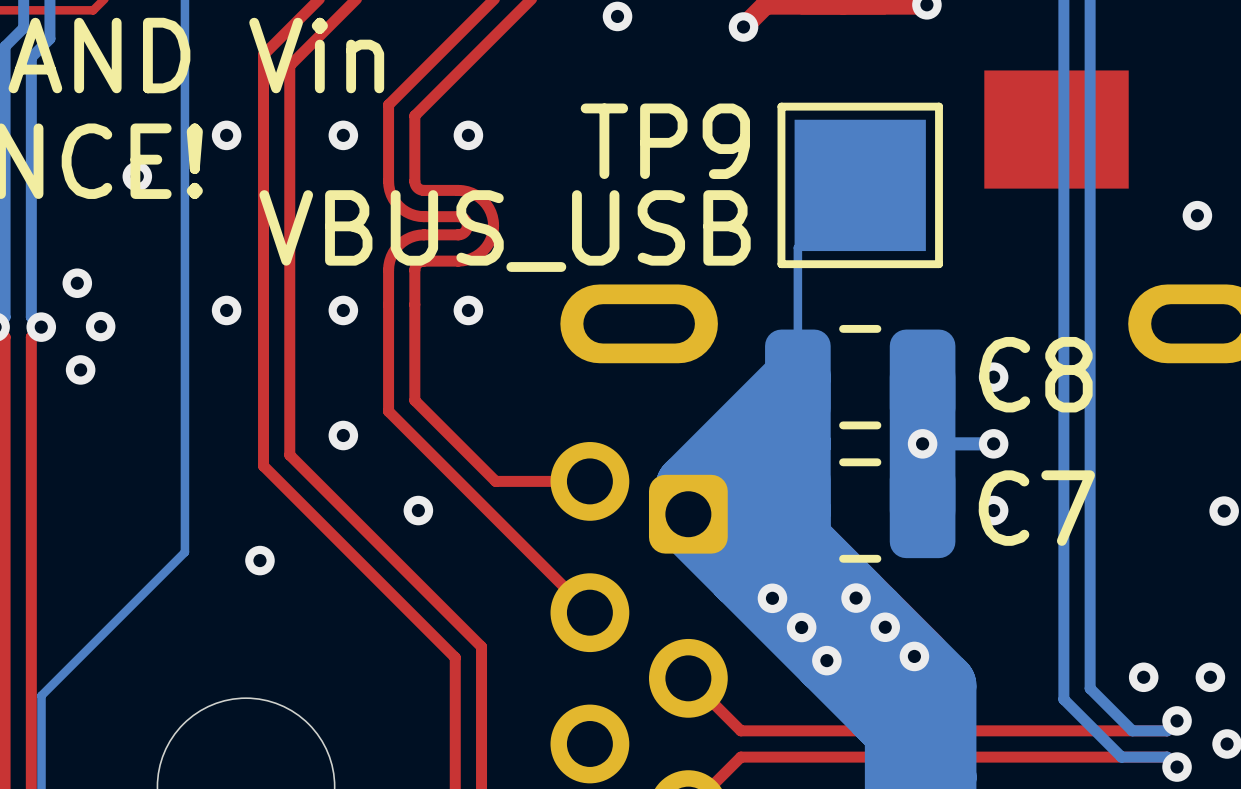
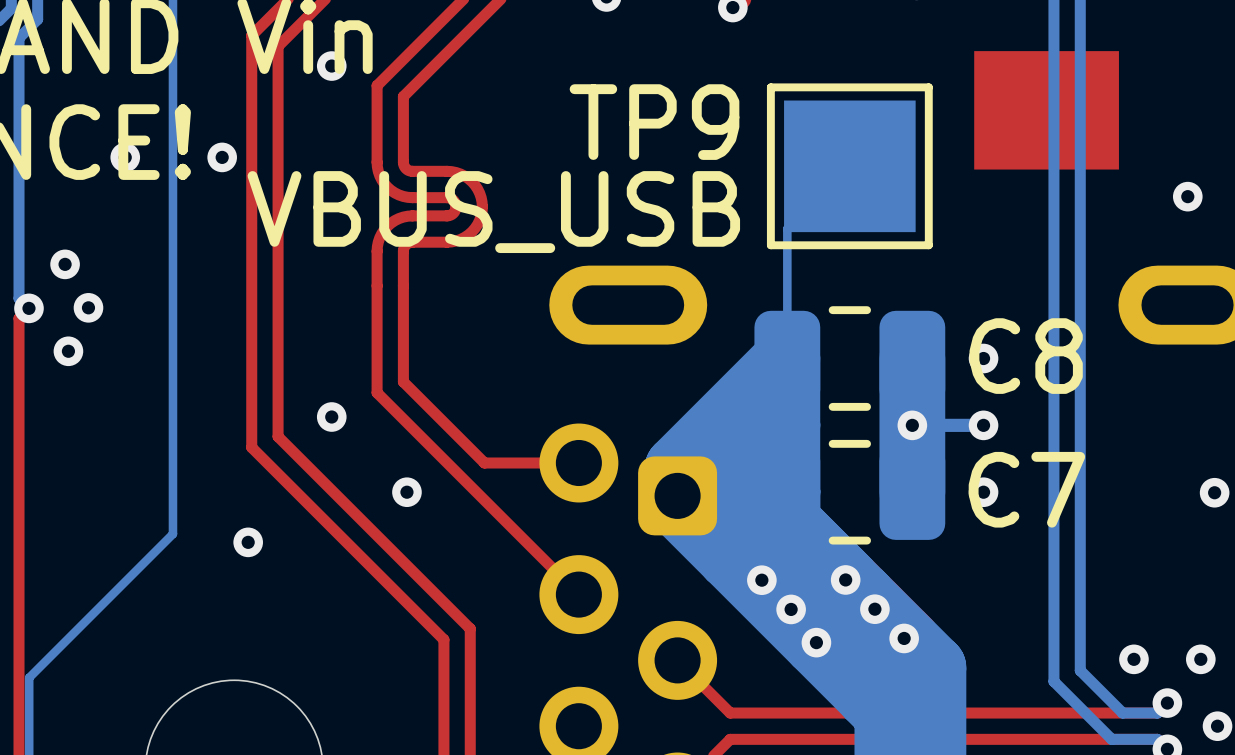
via position: (226, 135) -> (222, 157)
via position: (343, 135) -> (331, 66)
via: (468, 135) -> none
via: (226, 310) -> none
via: (343, 310) -> none
via: (468, 310) -> none

